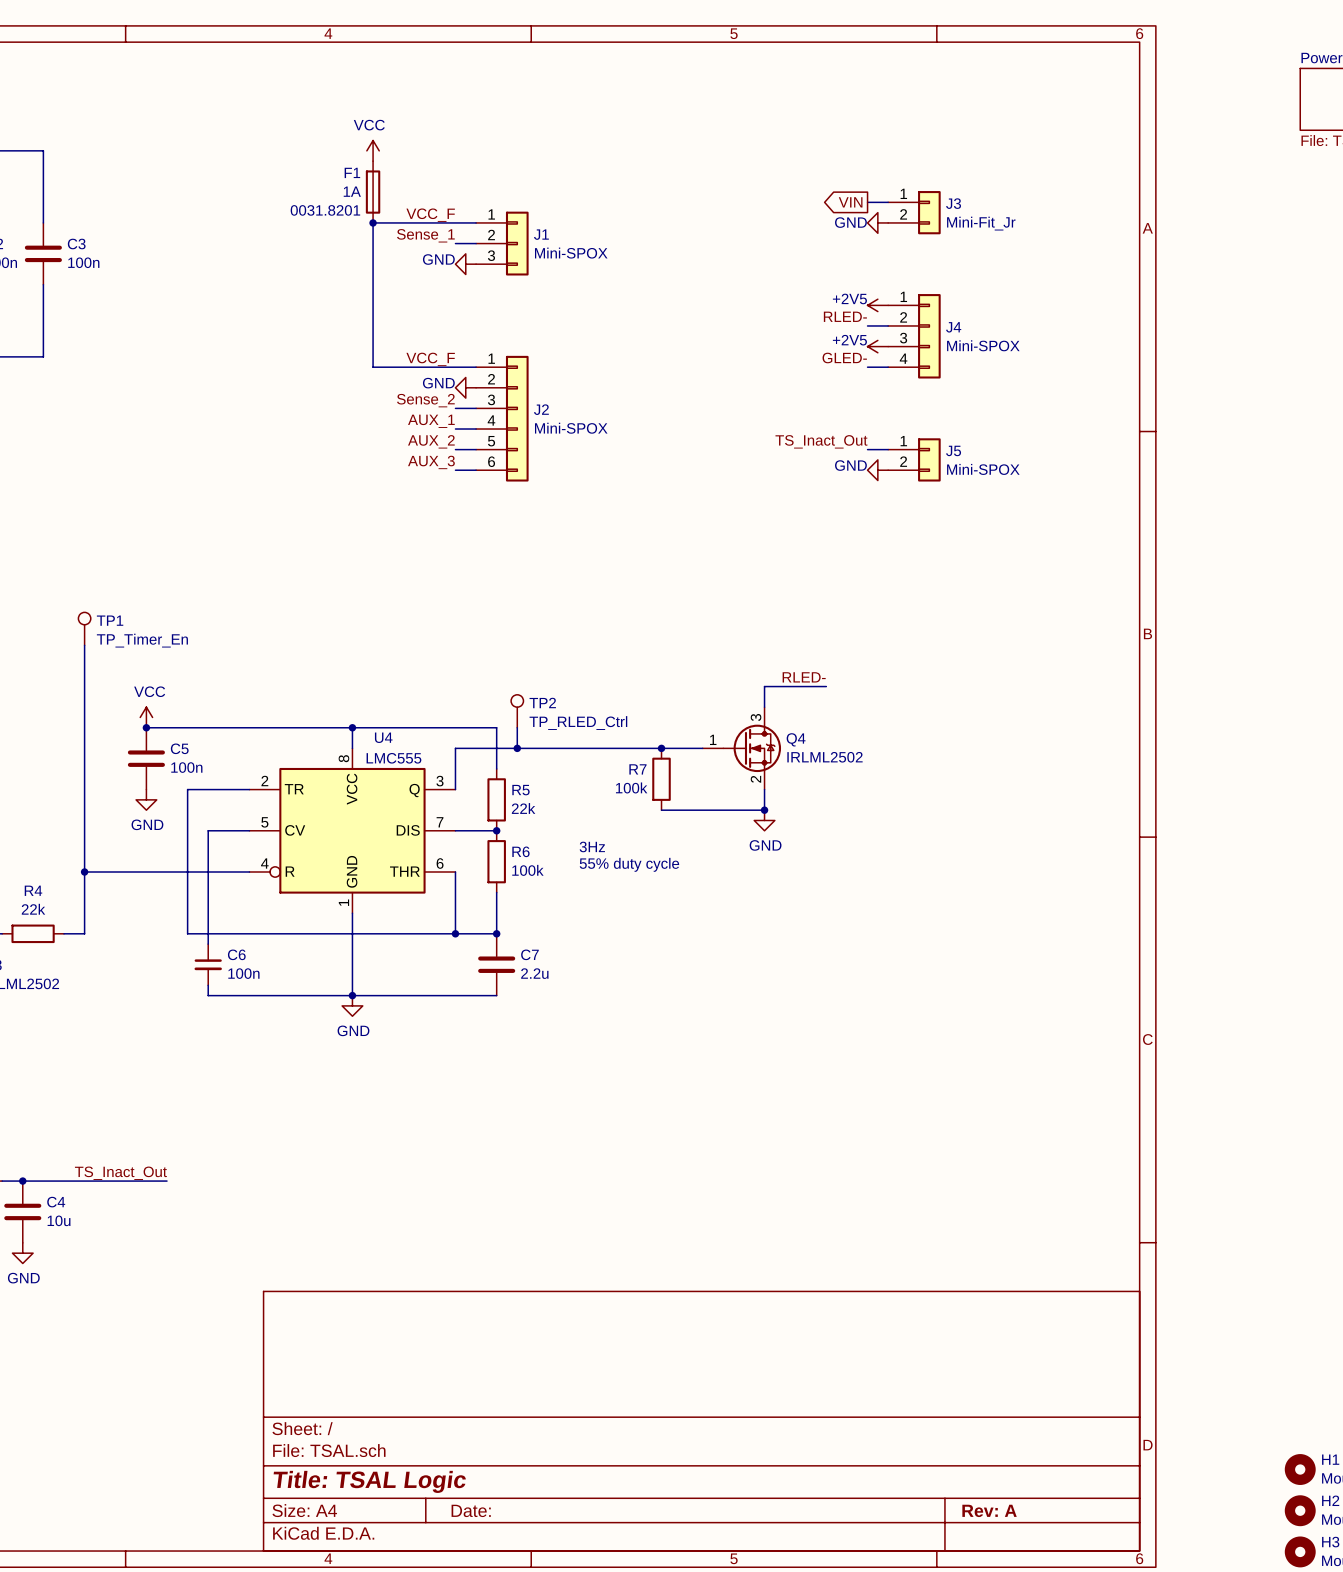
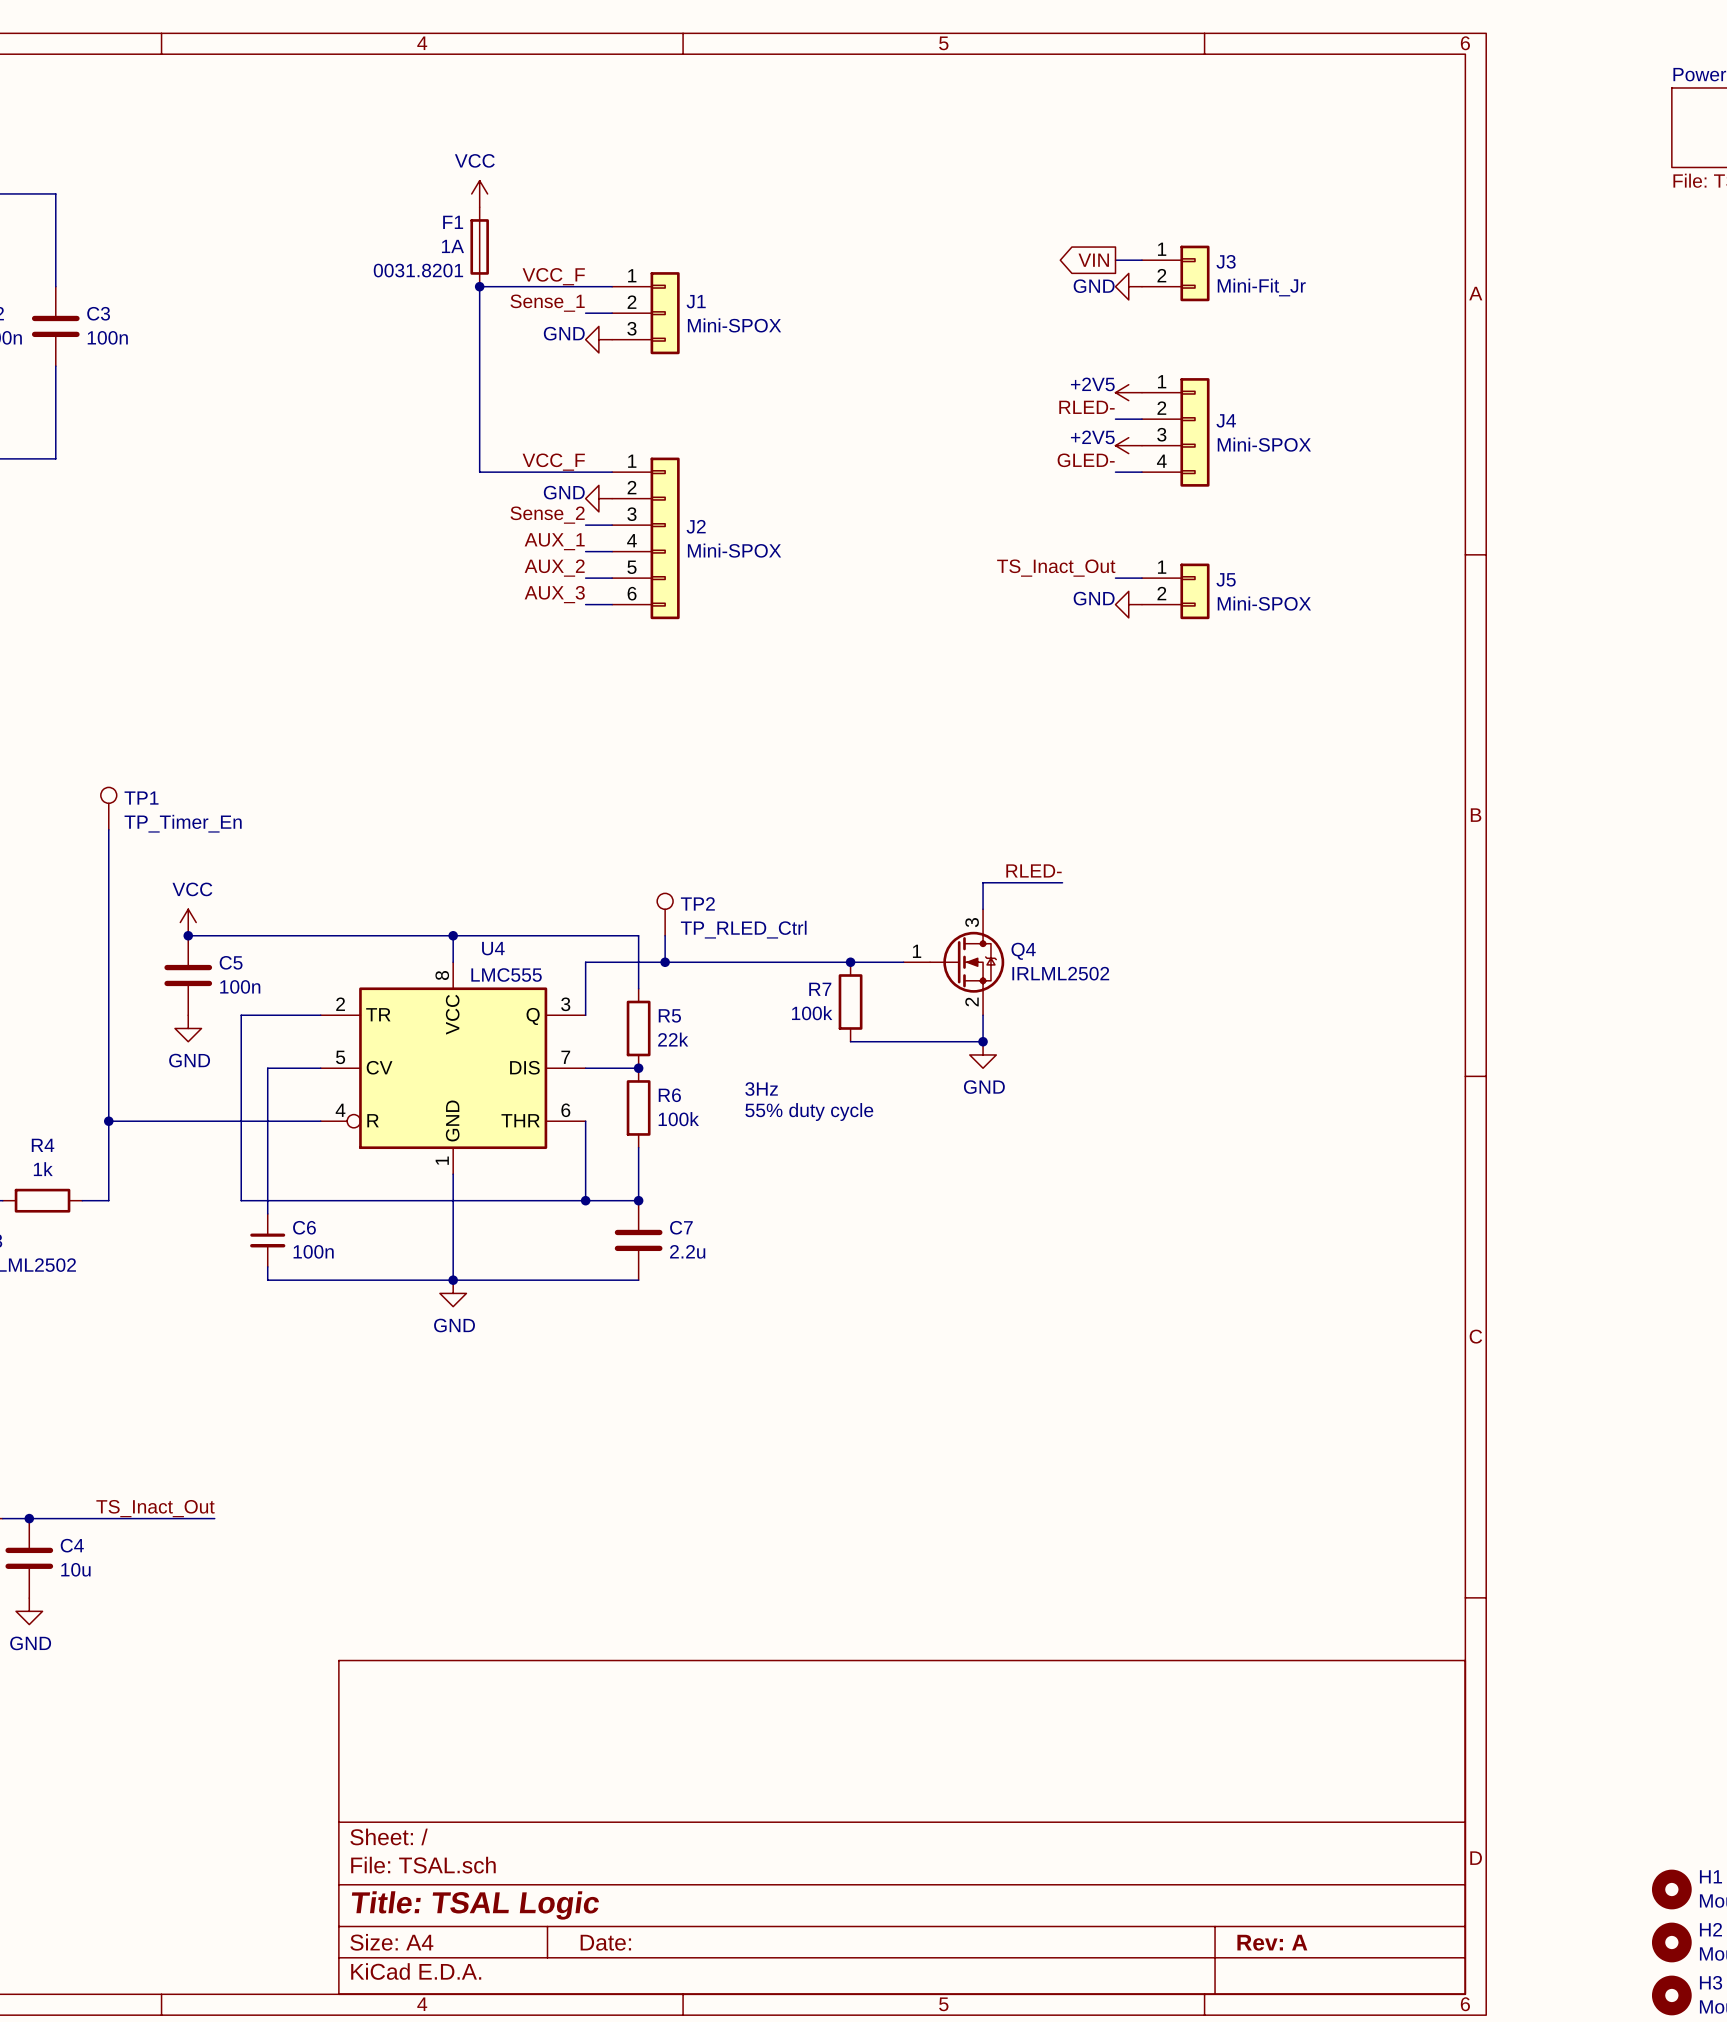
R4 value: 22k (33, 909) -> 1k (43, 1169)

